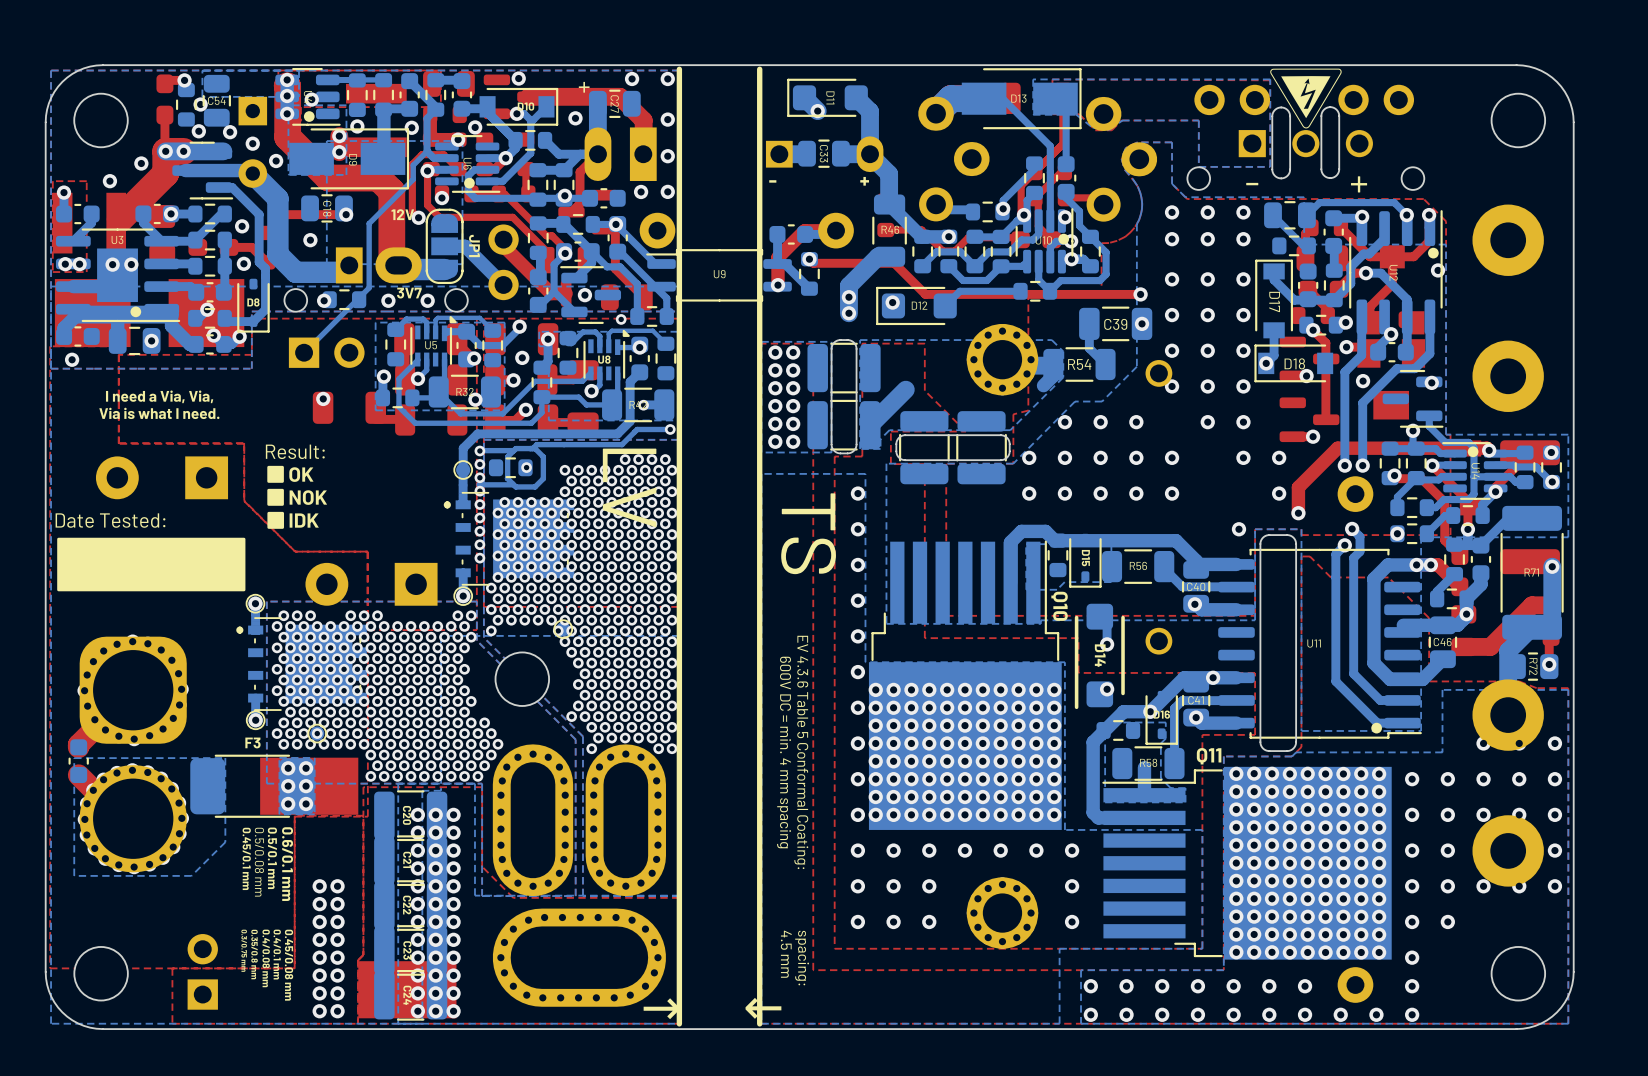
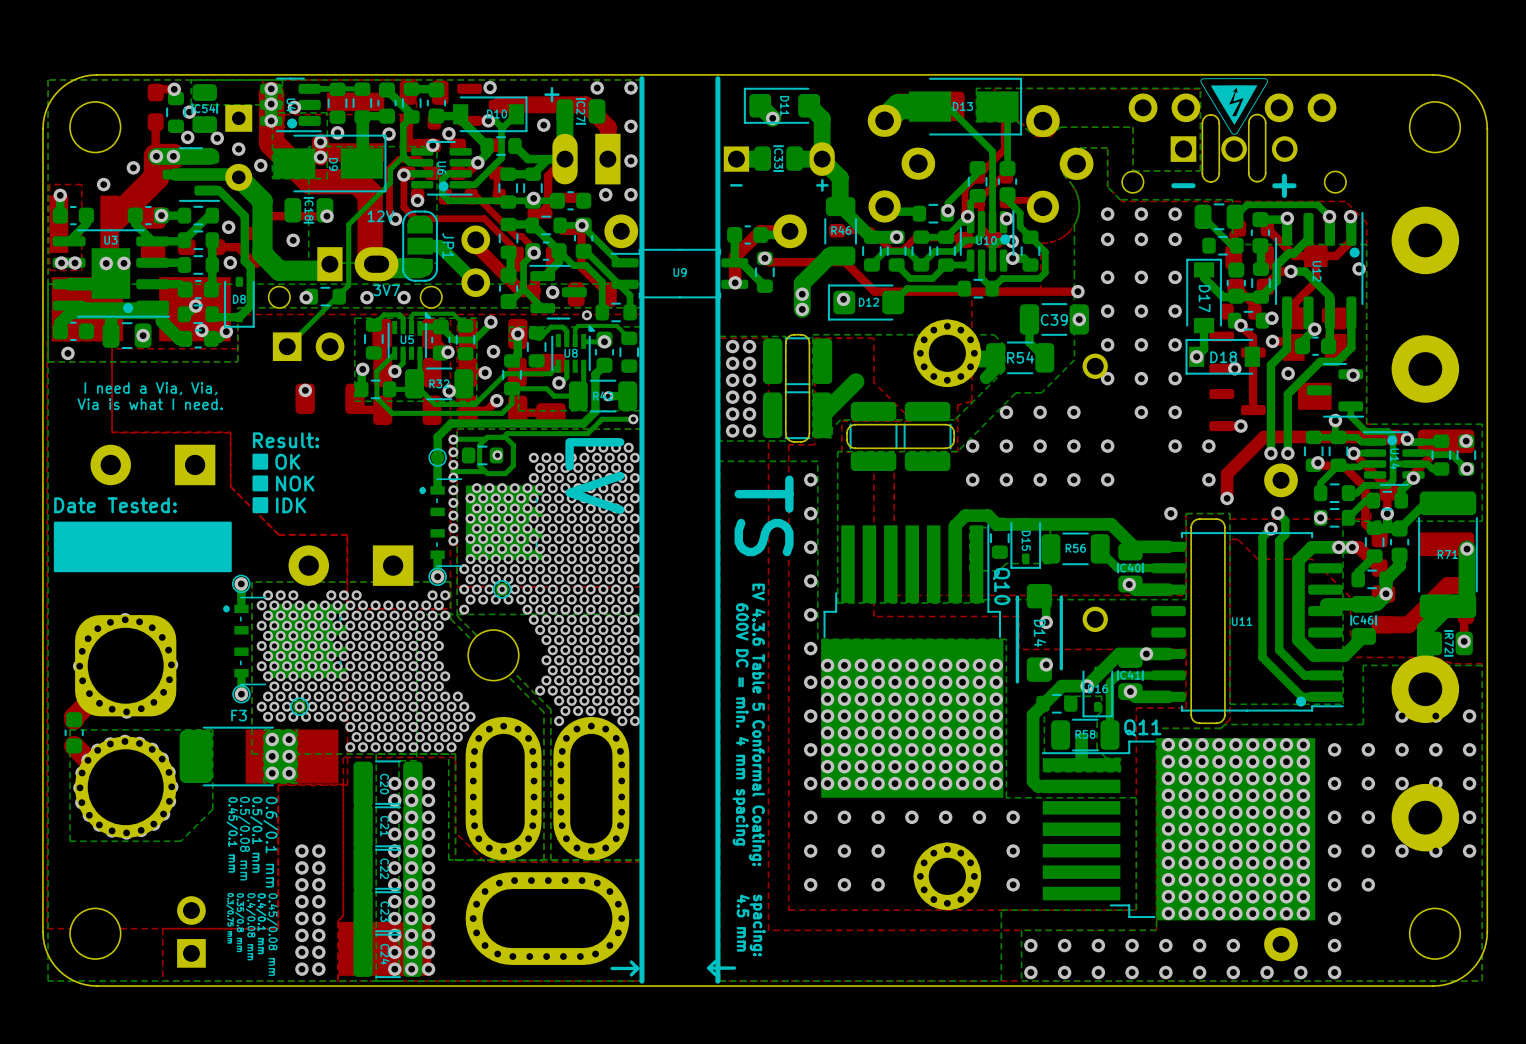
part position: (563, 629) -> (502, 589)

